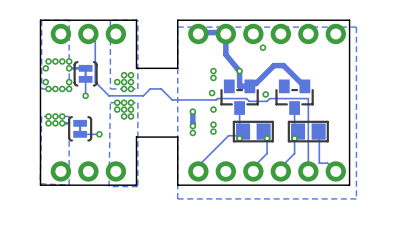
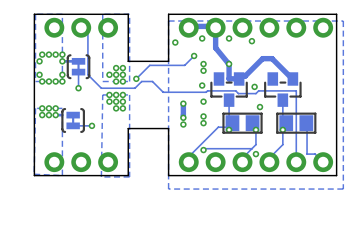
via: none -> (202, 38)
via: none -> (229, 38)
via: none -> (175, 42)
track: none -> (194, 55) (184, 65) (149, 65) (136, 78)
via: none -> (194, 55)
via: none -> (136, 78)
via: none -> (259, 107)
track: none -> (251, 148) (203, 150)
via: none -> (203, 150)
via: none -> (255, 154)

